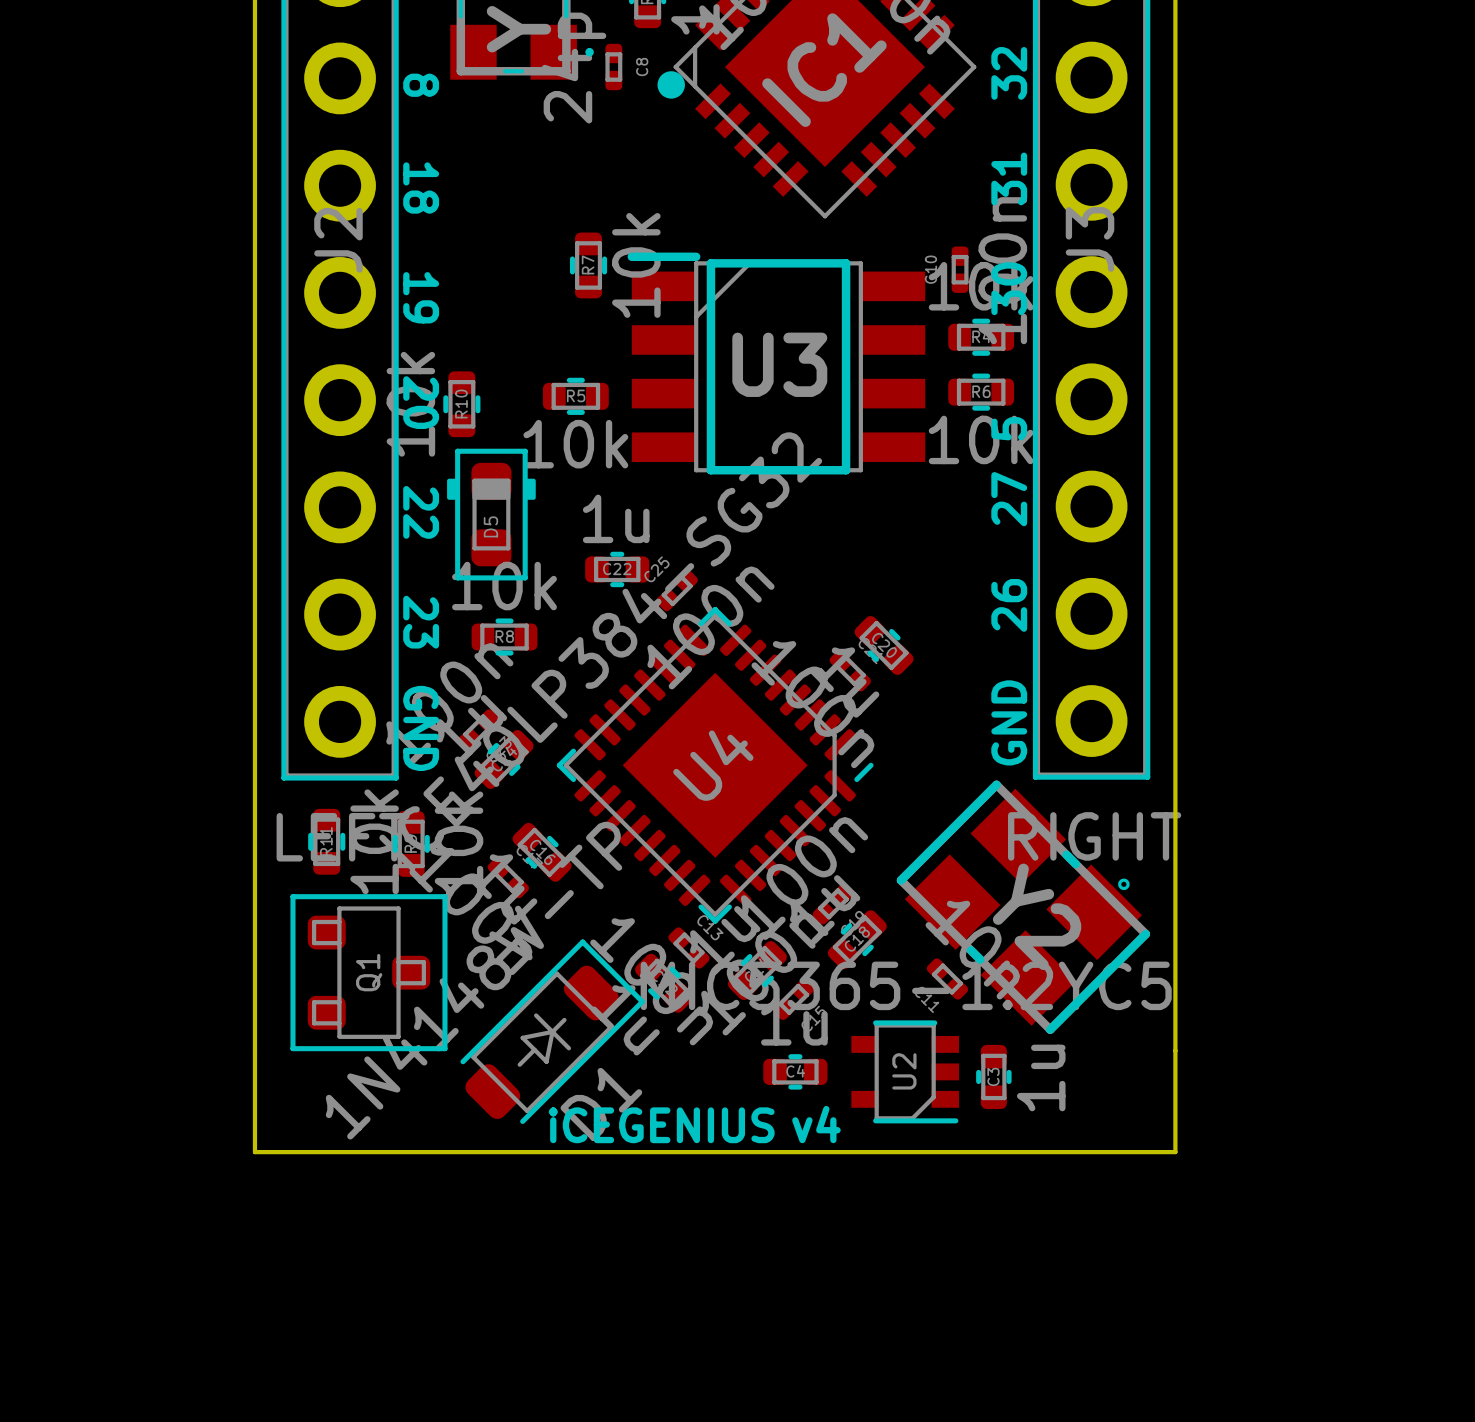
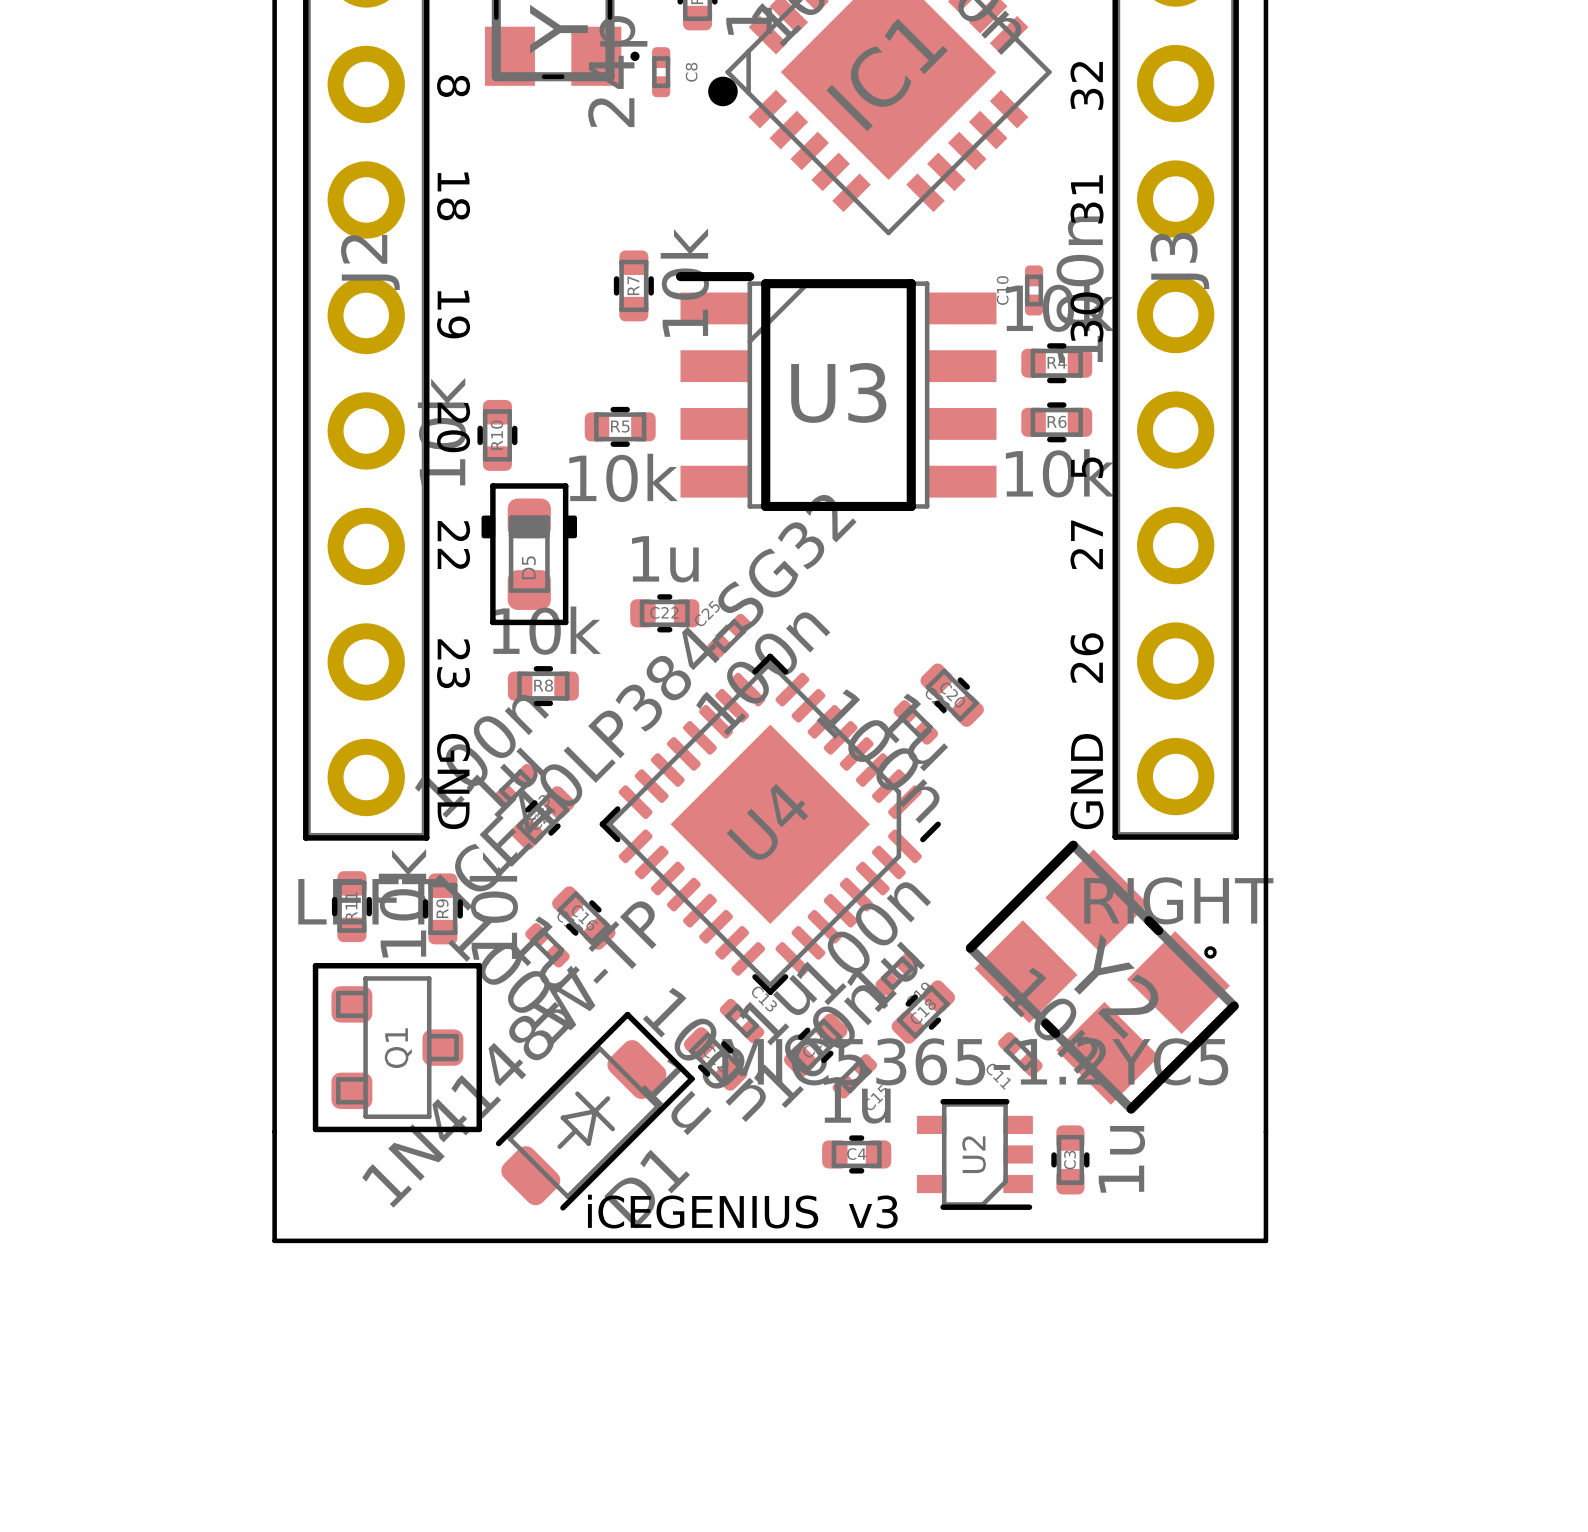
text: v4 (816, 1124) -> v3 (873, 1211)

